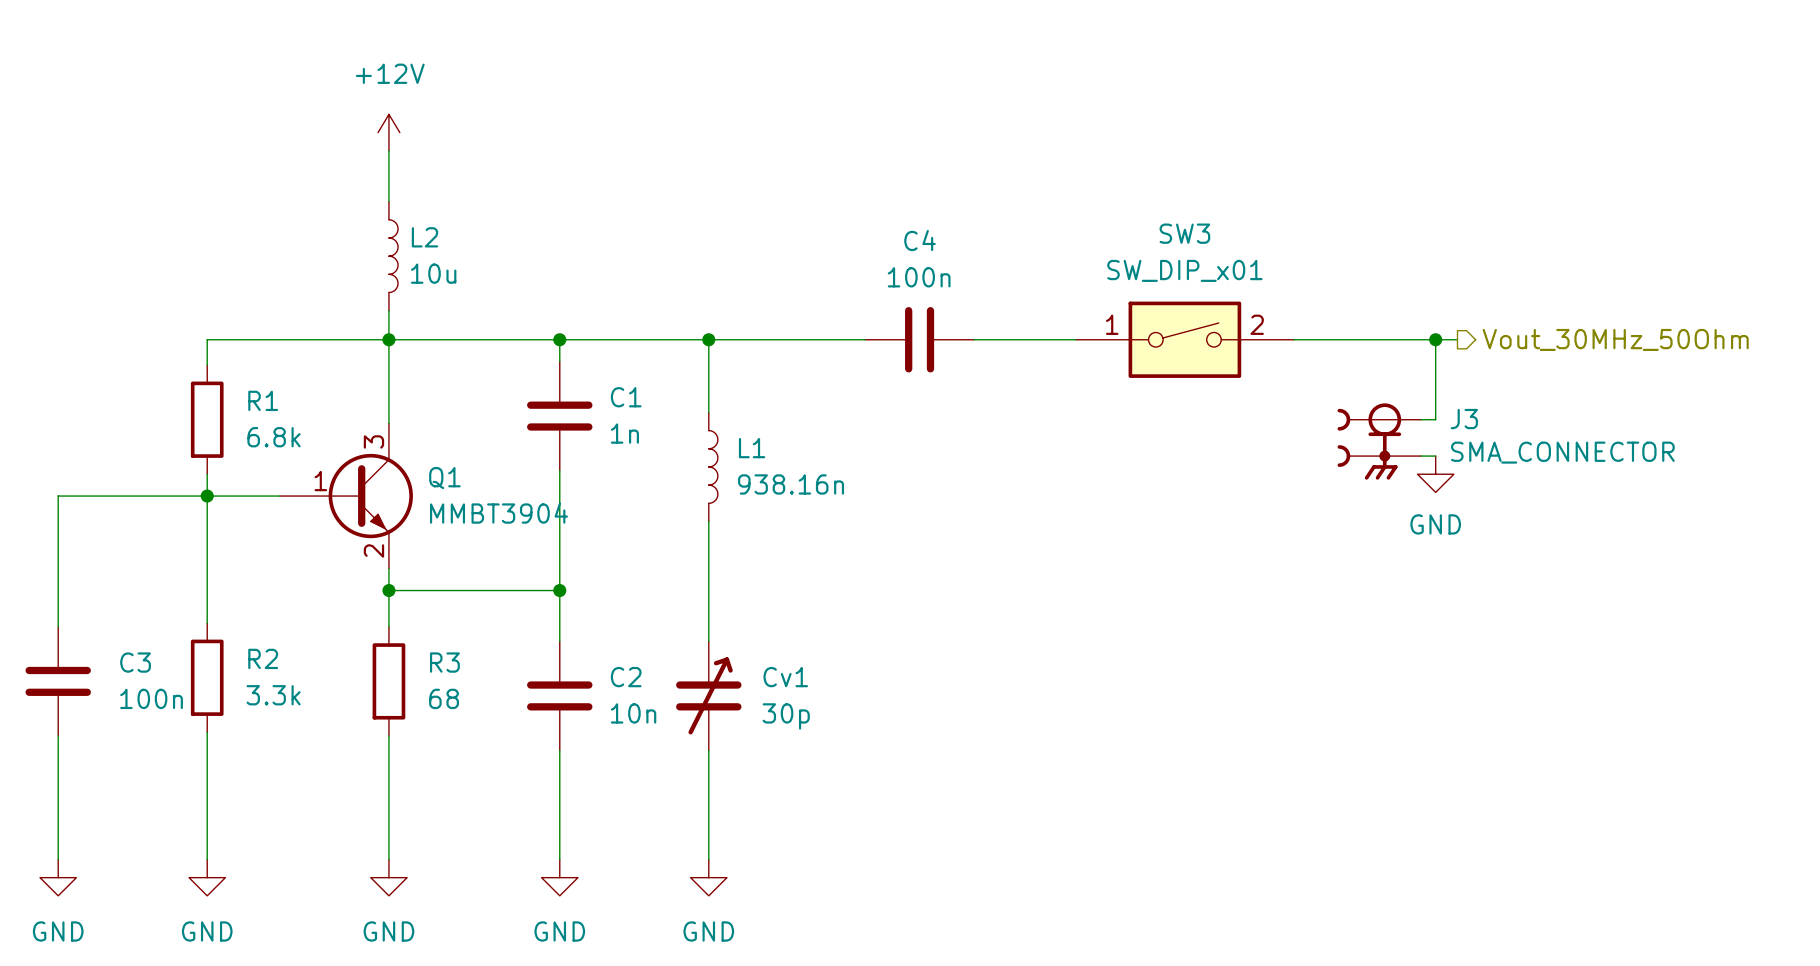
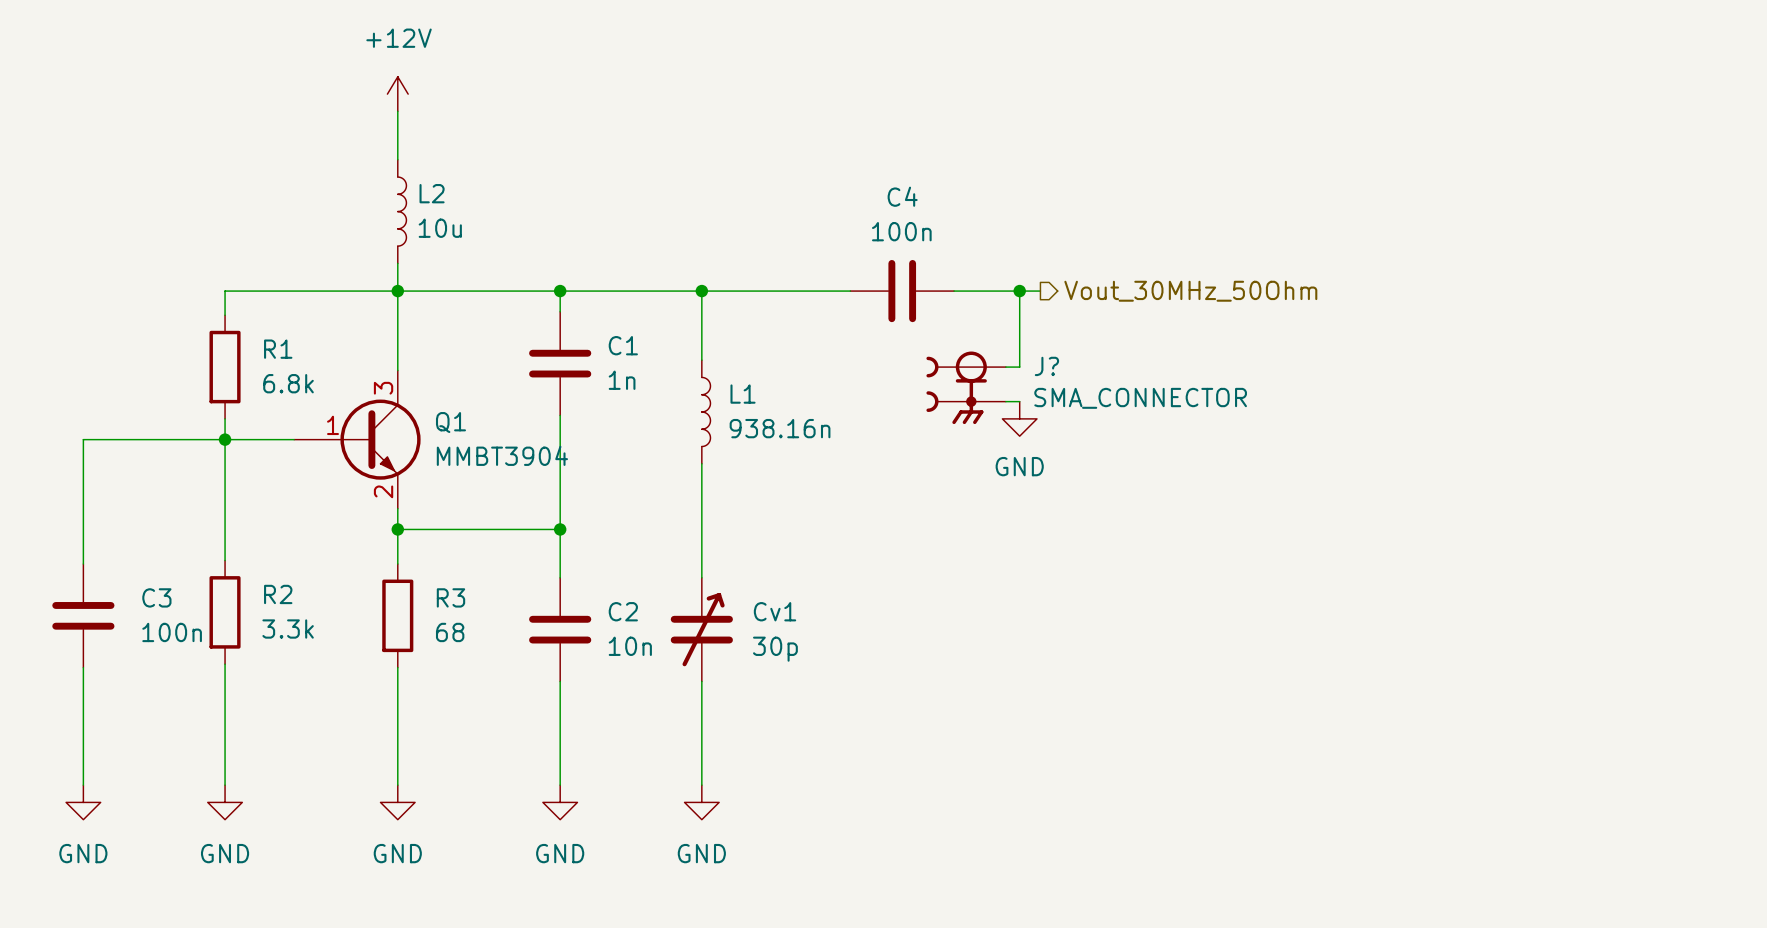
wire: none -> (1019, 291) (1019, 367) (1005, 367)
junction: none -> (1019, 291)
wire: (1064, 339) (1075, 339) -> none
SW3: SW_DIP_x01 (1184, 339) -> none
hierarchical label: none -> Vout_30MHz_50Ohm (1190, 291)
wire: (1293, 339) (1457, 339) -> none
wire: (1435, 339) (1435, 419) (1421, 419) -> none
junction: (1435, 339) -> none
hierarchical label: Vout_30MHz_50Ohm (1615, 339) -> none
J?: none -> SMA_CONNECTOR (966, 387)
J3: SMA_CONNECTOR (1379, 441) -> none
wire: none -> (1005, 401) (1019, 401)
wire: (1421, 456) (1435, 456) -> none
power symbol: none -> GND (1019, 418)
power symbol: GND (1435, 474) -> none

